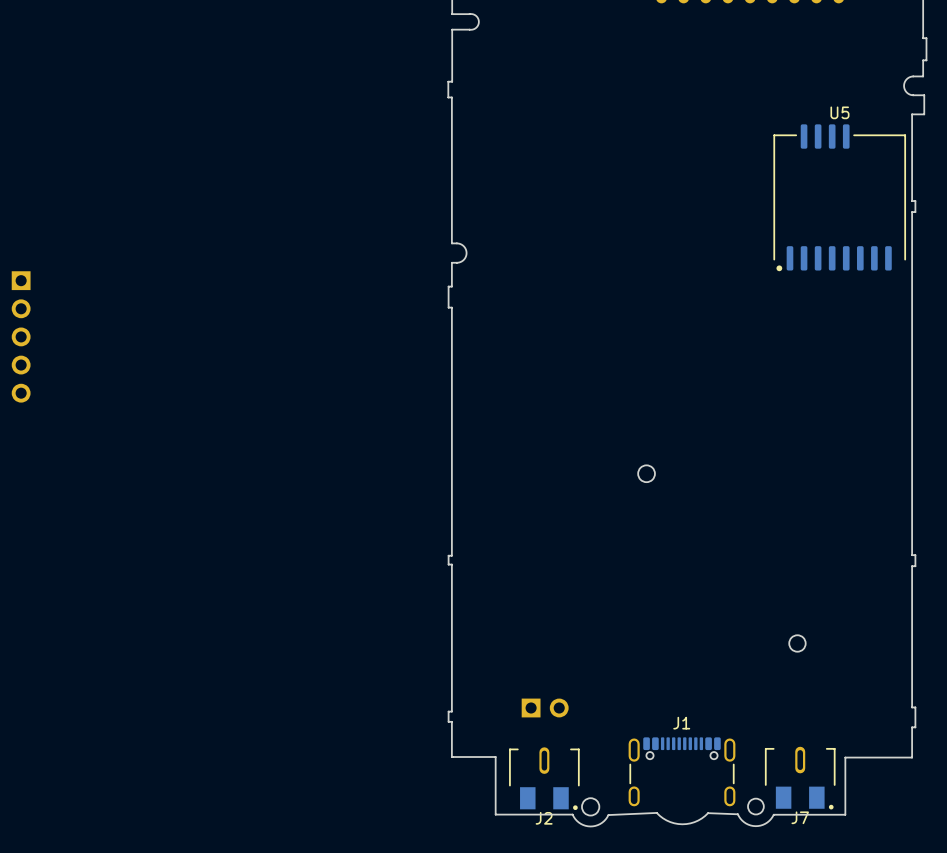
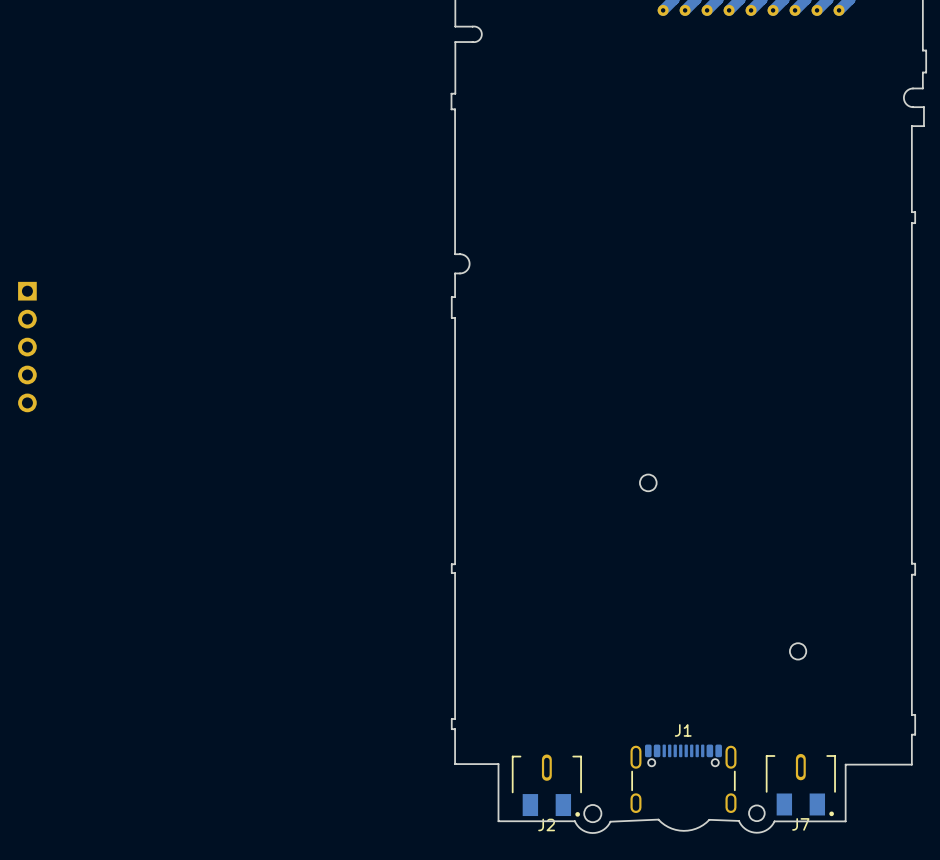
U5: (839, 197) -> none
part: (545, 707) -> none

